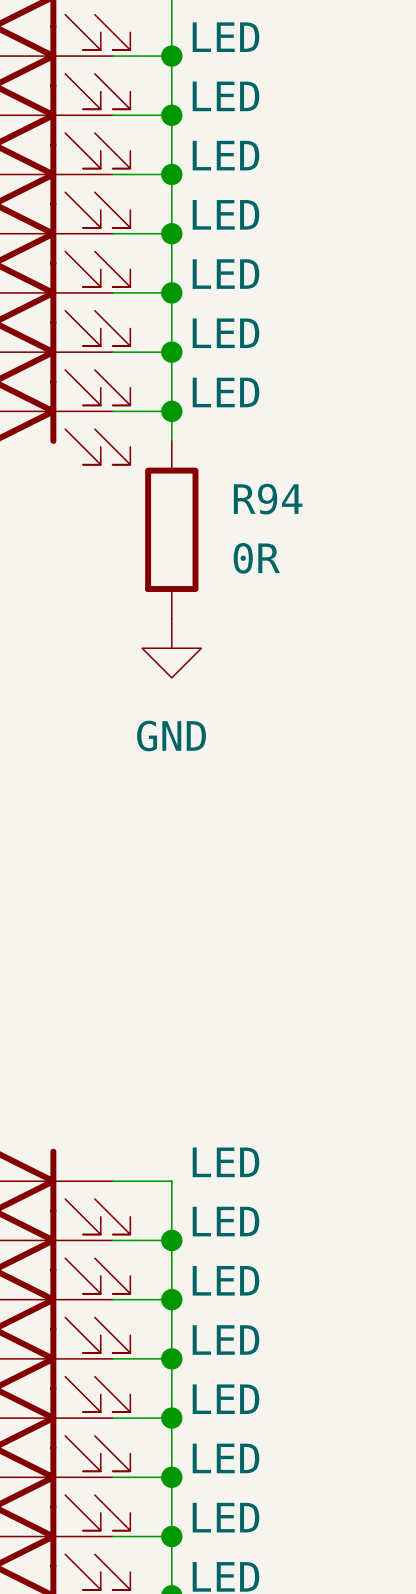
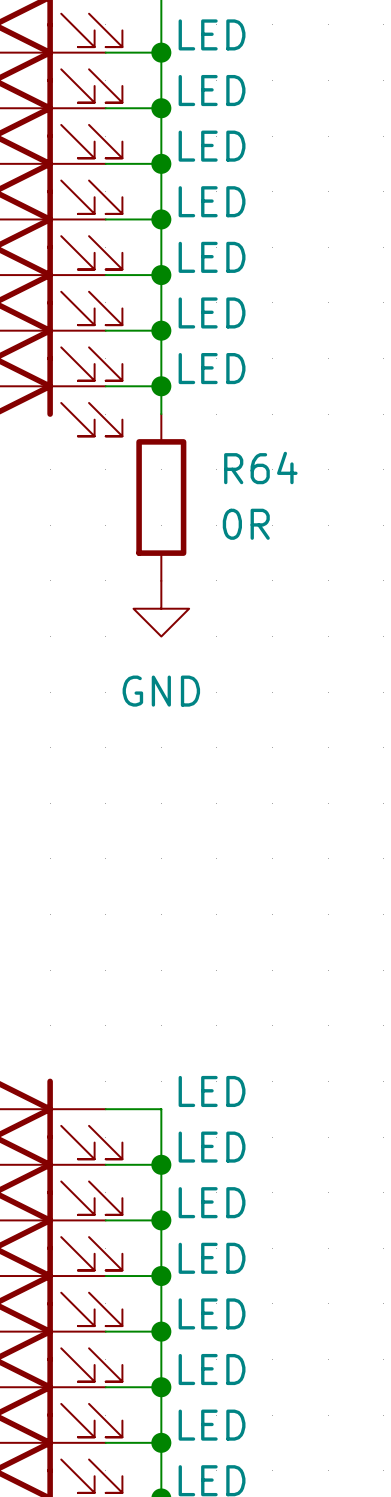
R94 name: R94 (268, 499) -> R64 (260, 468)

